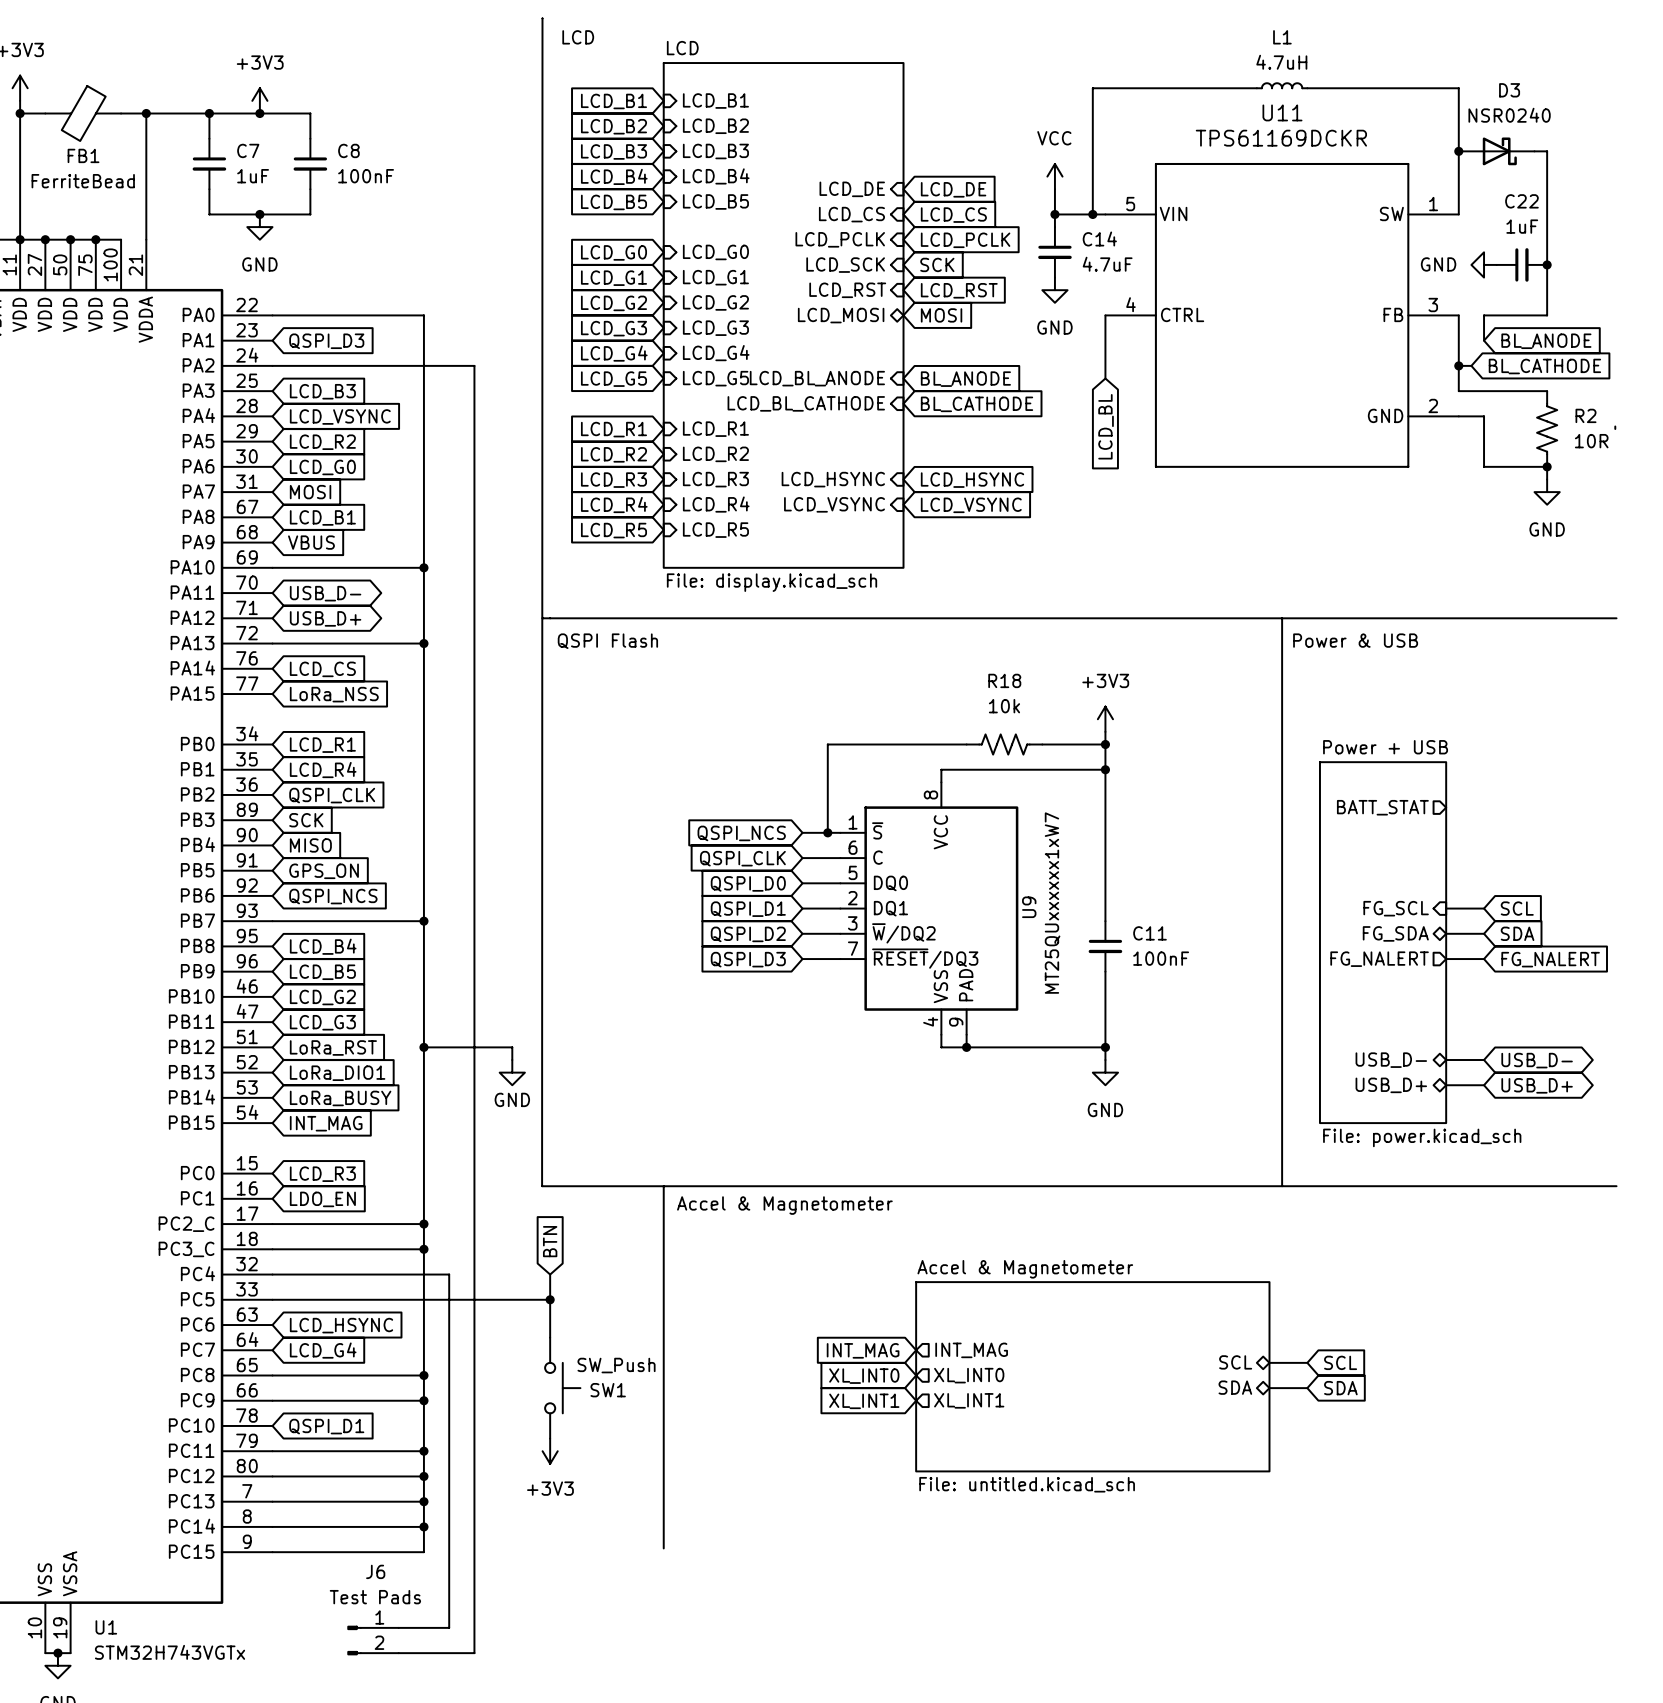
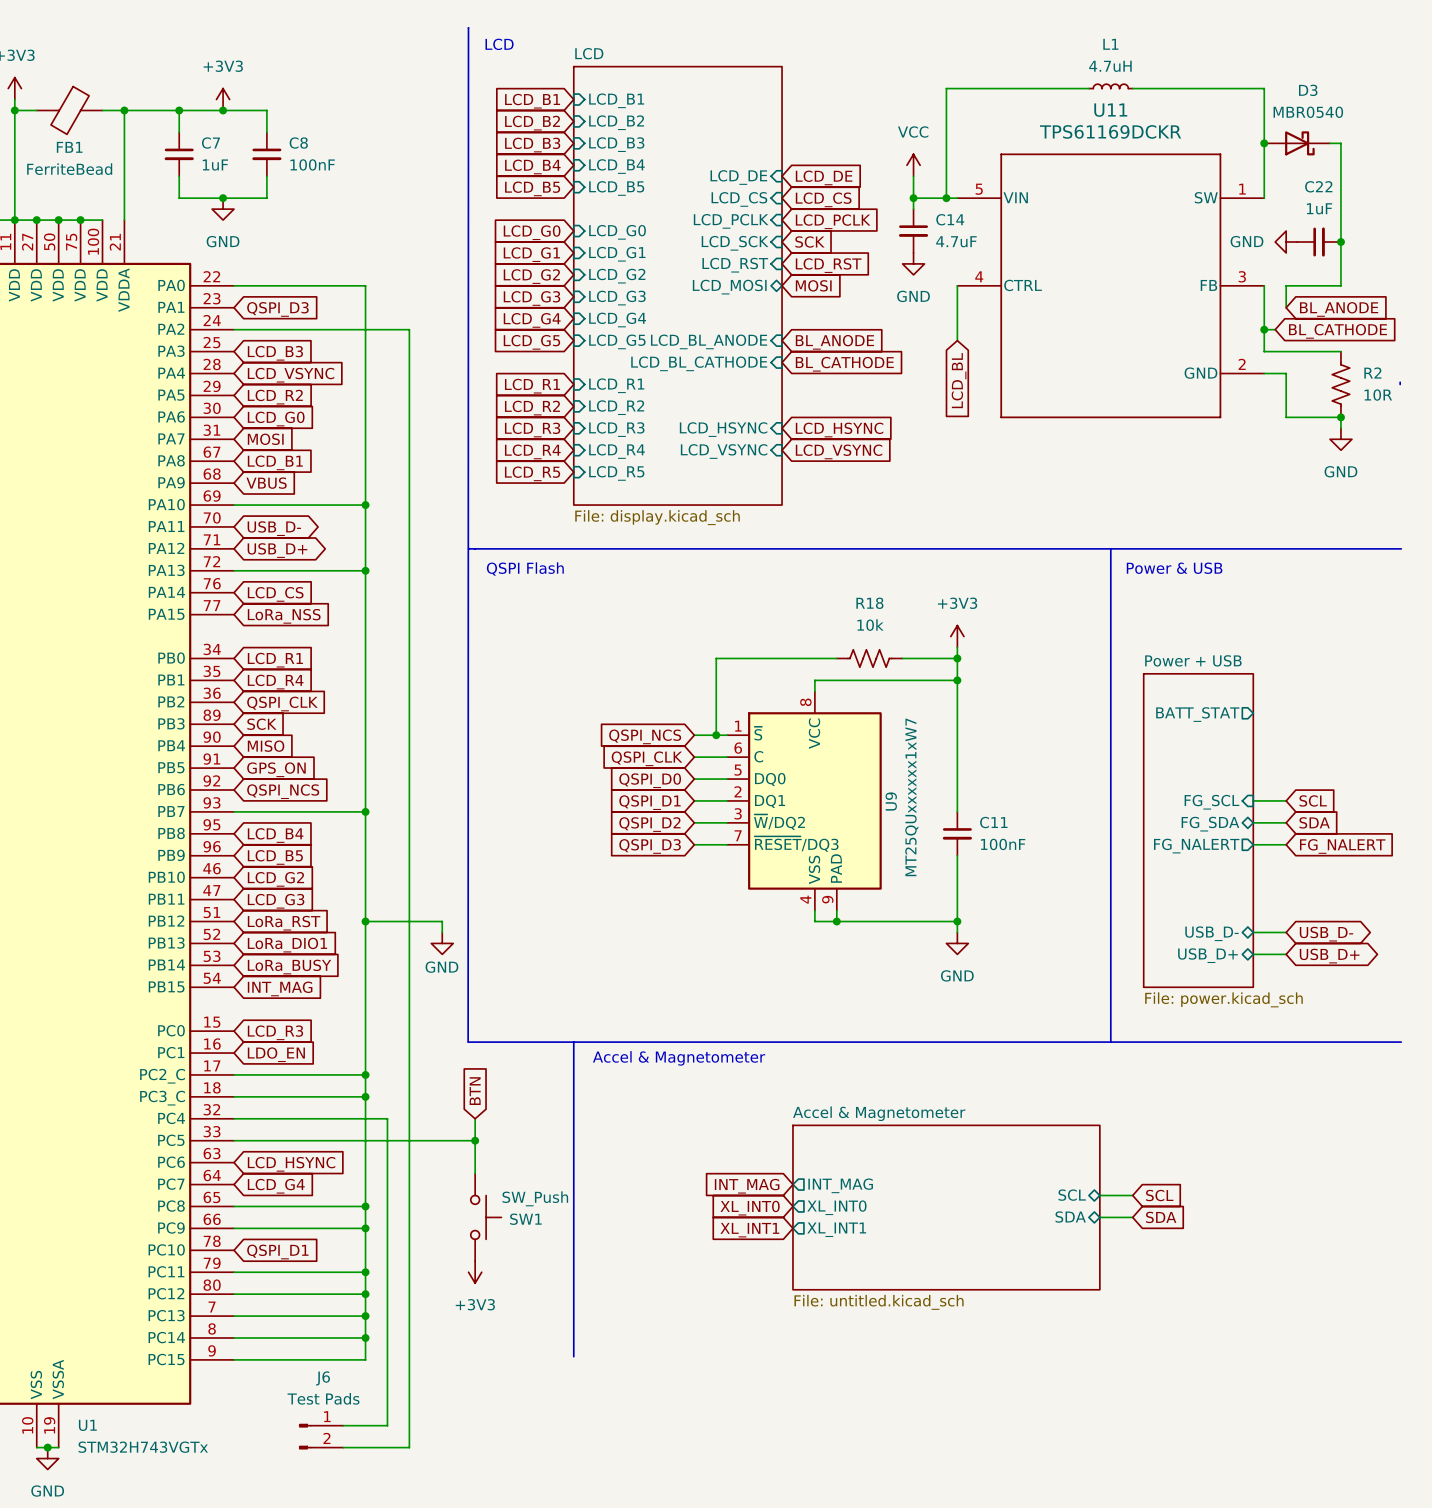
D3 value: NSR0240 (1509, 115) -> MBR0540 (1308, 112)

